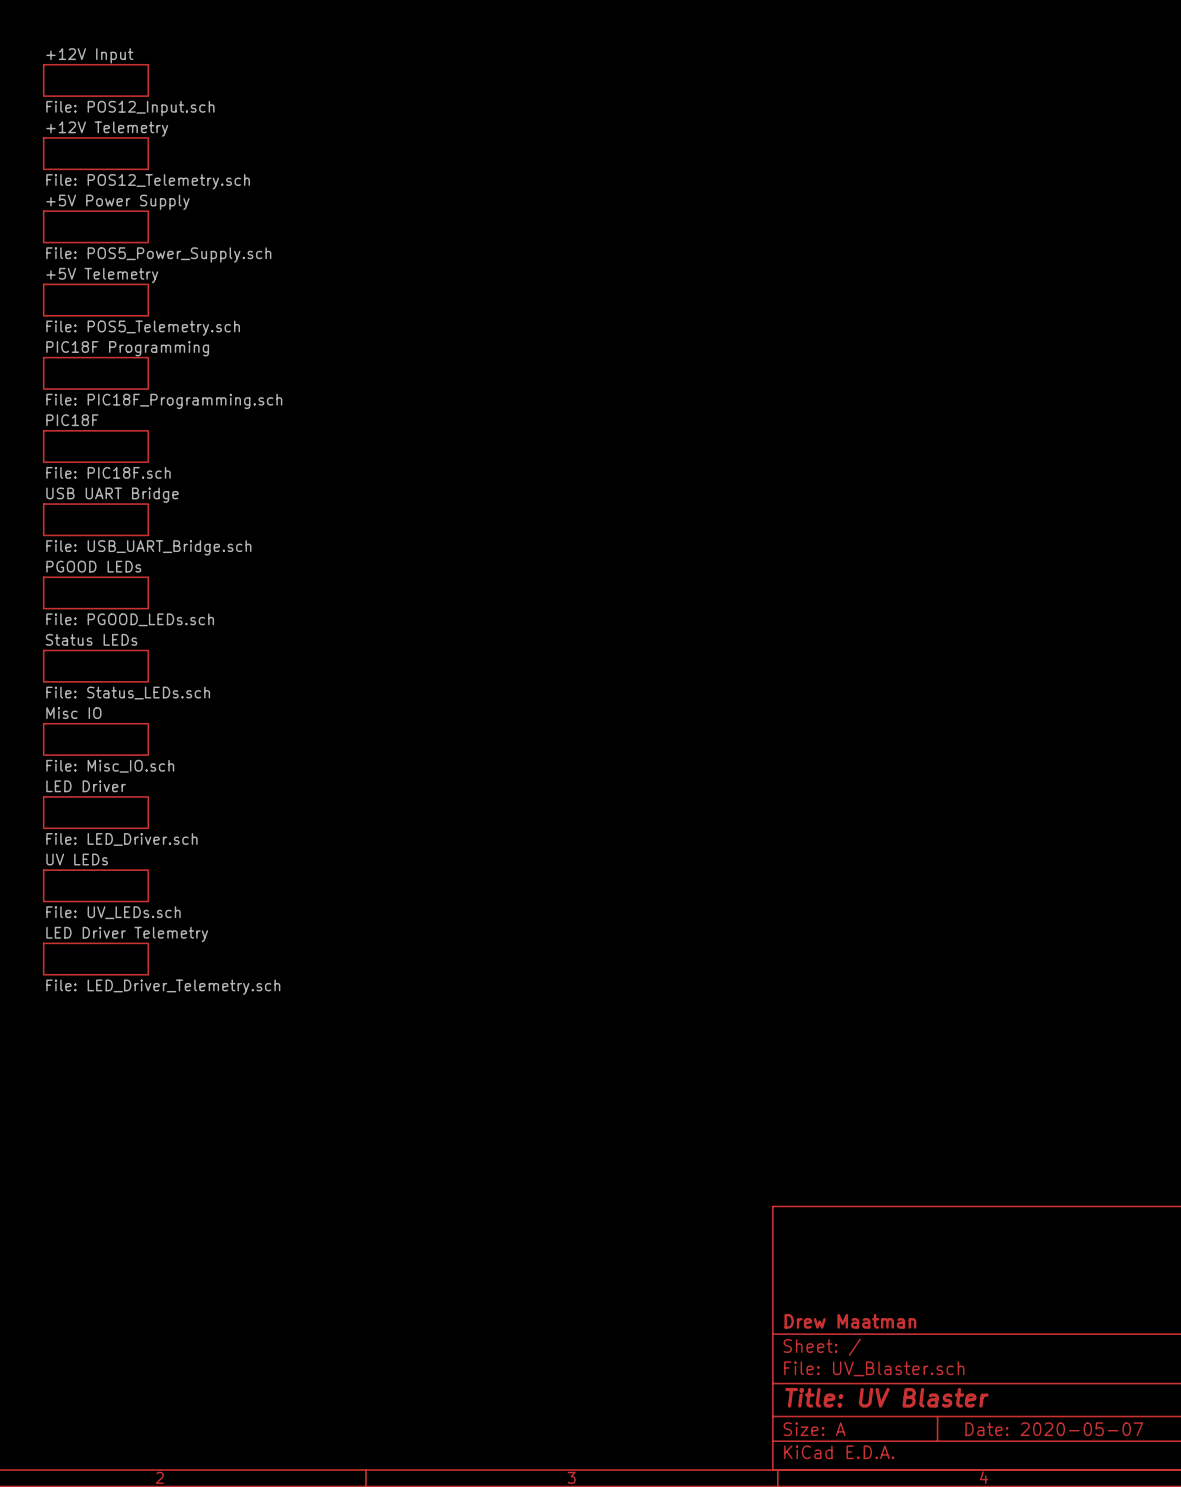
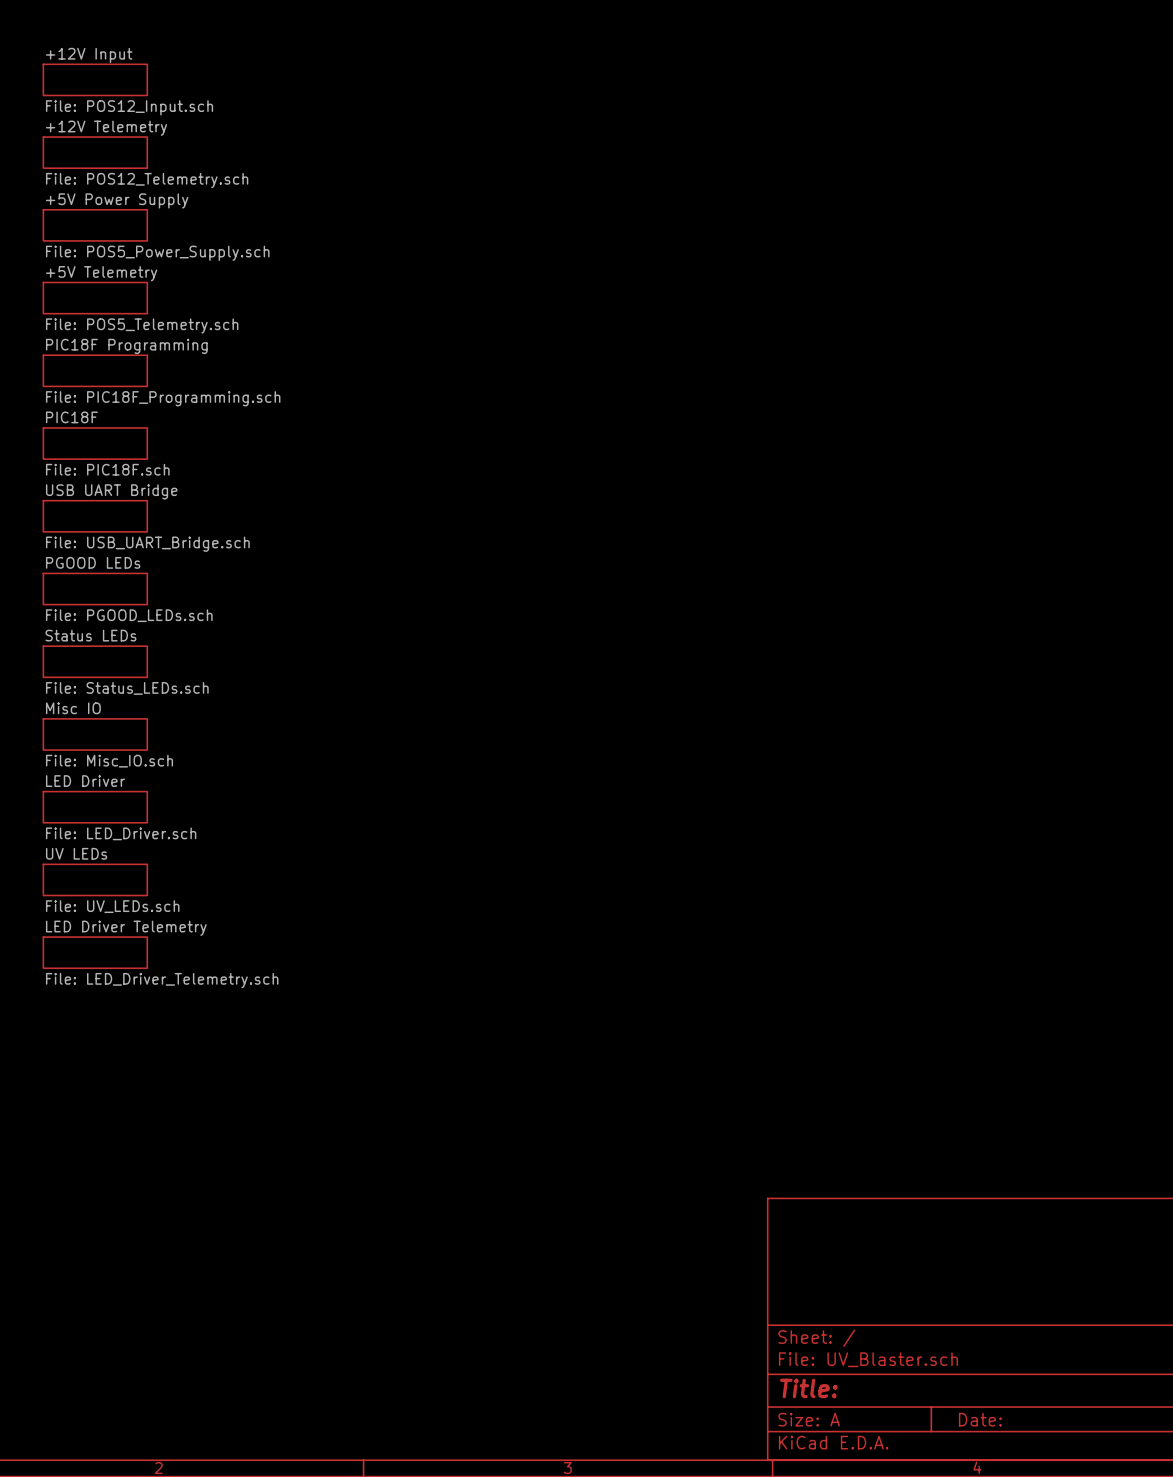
title block: Drew Maatman (850, 1321) -> none
title block: Title: UV Blaster (886, 1397) -> Title: (808, 1388)
title block: Date: 2020-05-07 (1054, 1429) -> Date: (980, 1419)

